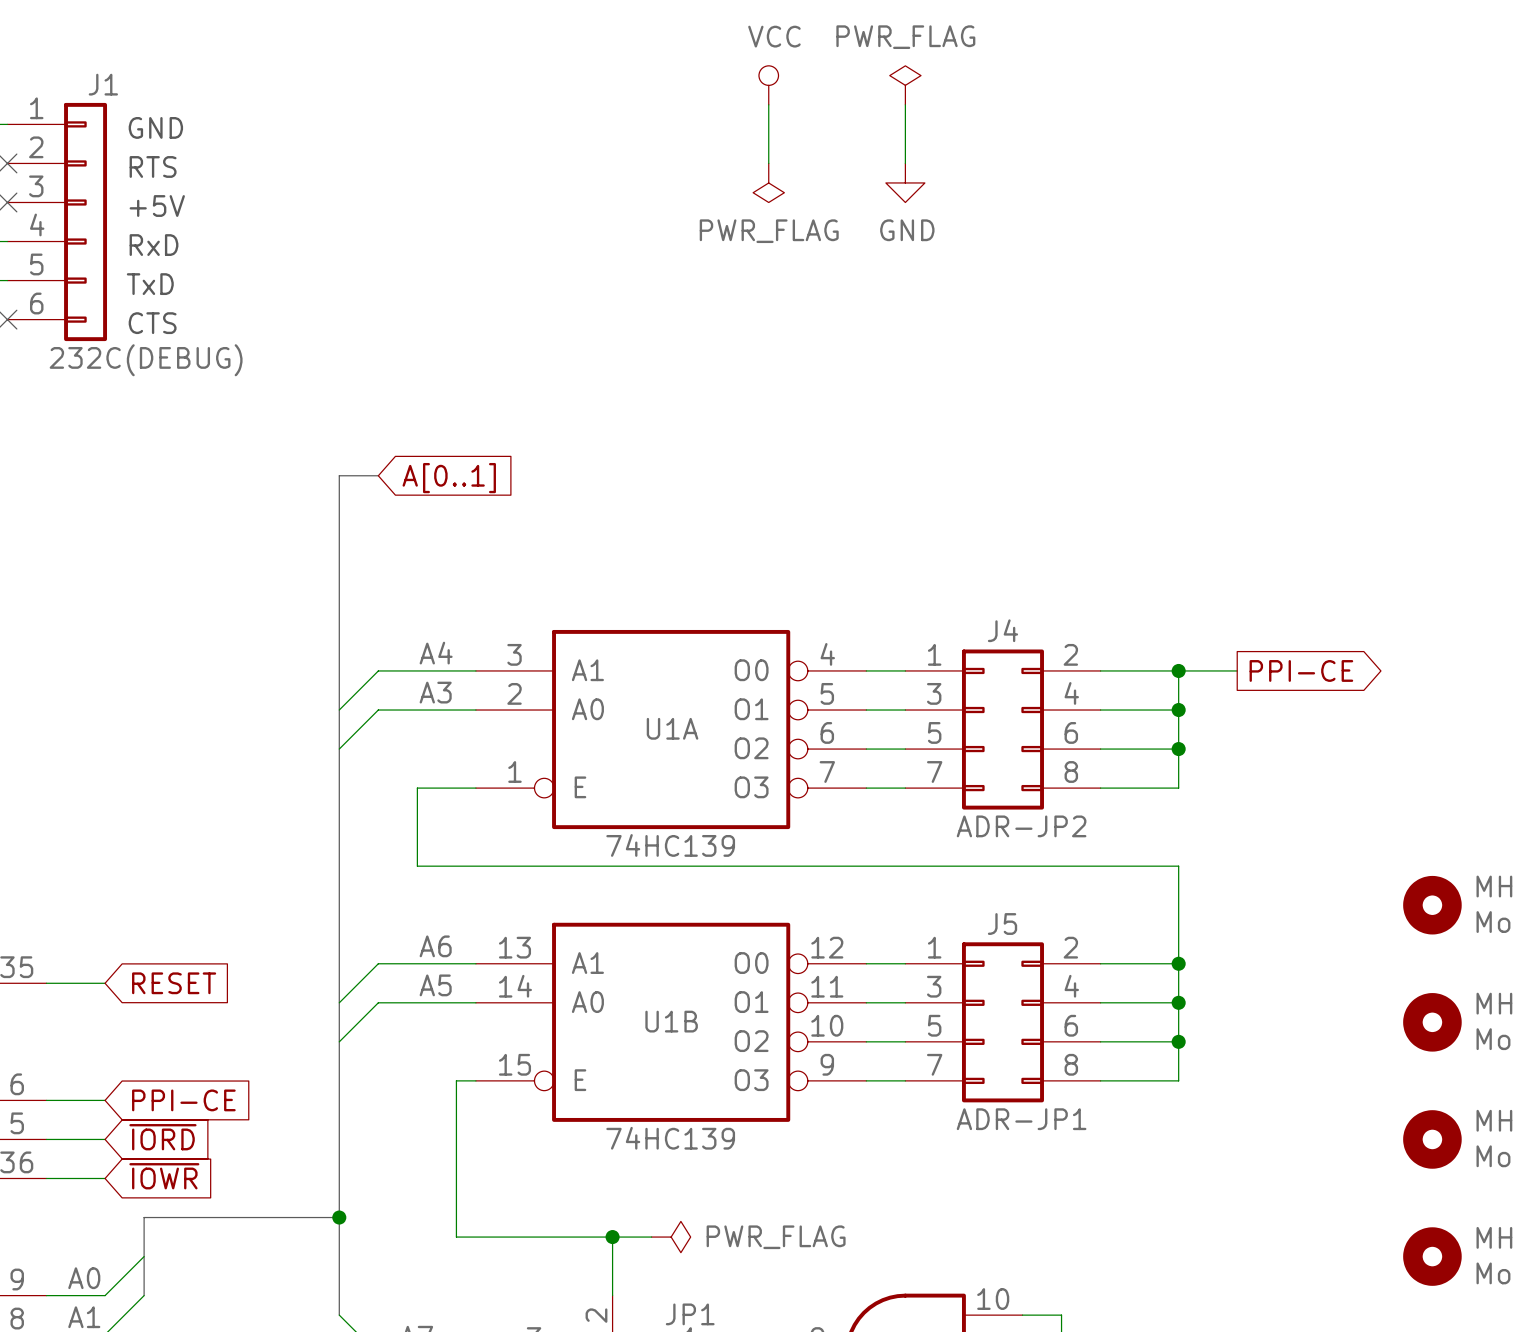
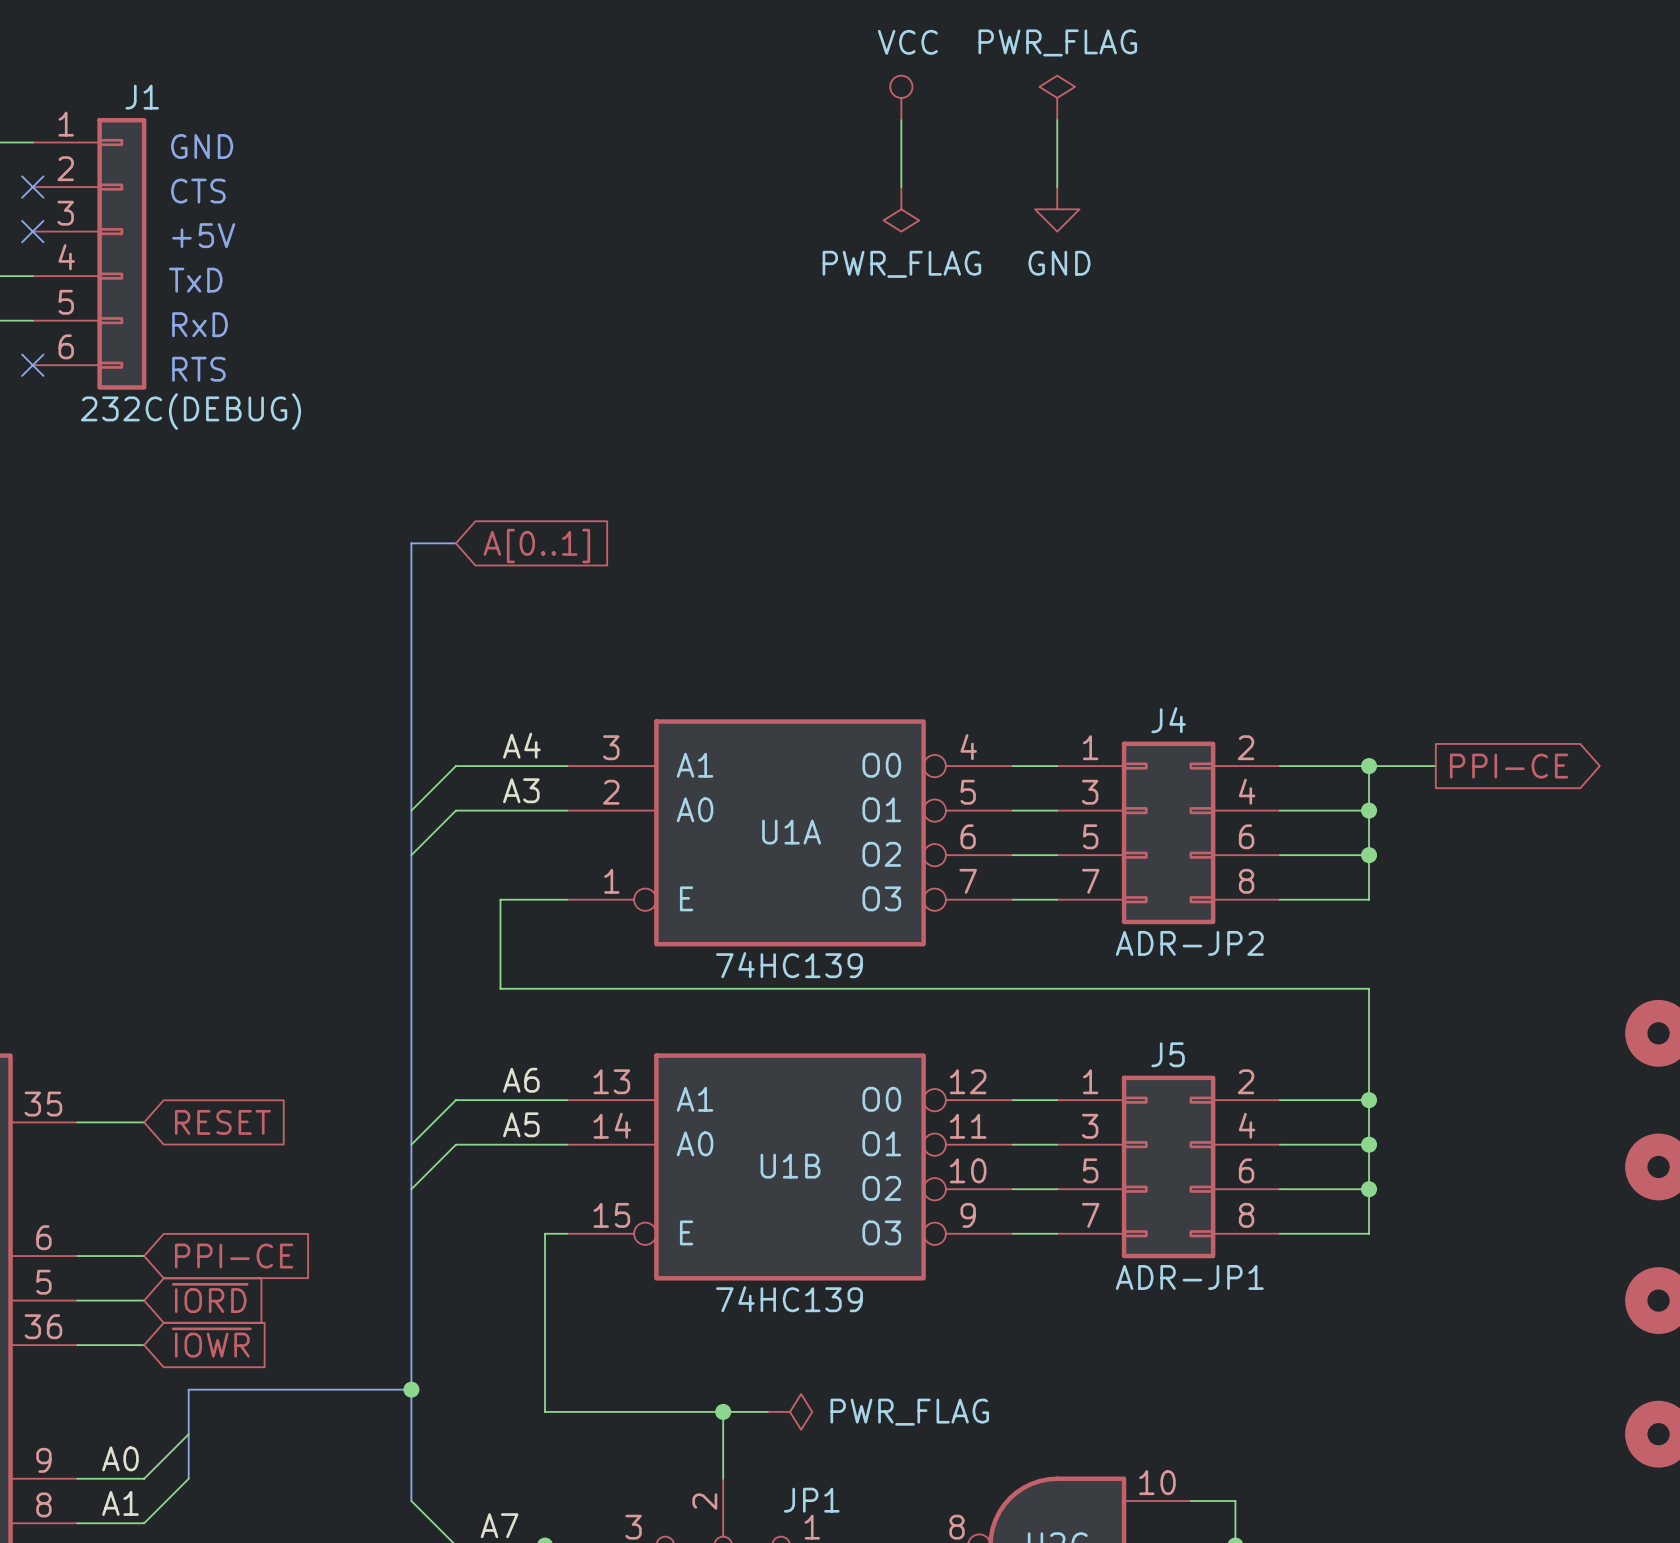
text: RTS (153, 166) -> CTS (198, 191)
text: RxD (154, 245) -> TxD (195, 280)
text: TxD (150, 284) -> RxD (200, 324)
text: CTS (152, 323) -> RTS (198, 369)

